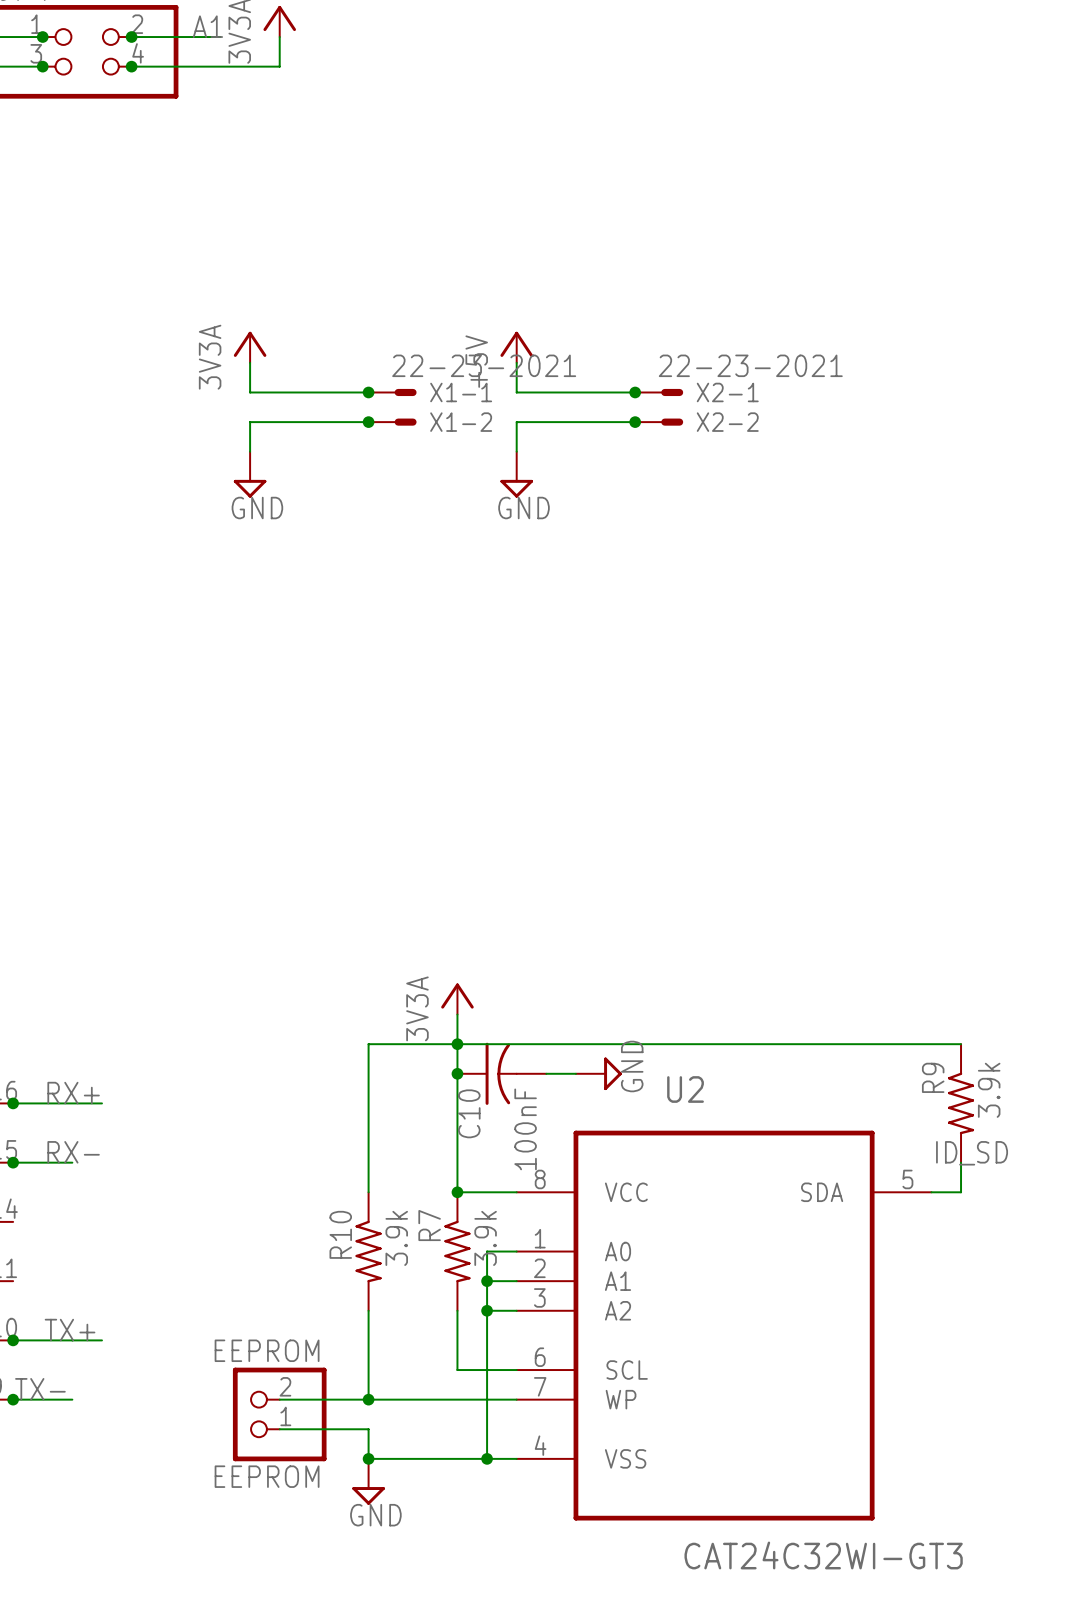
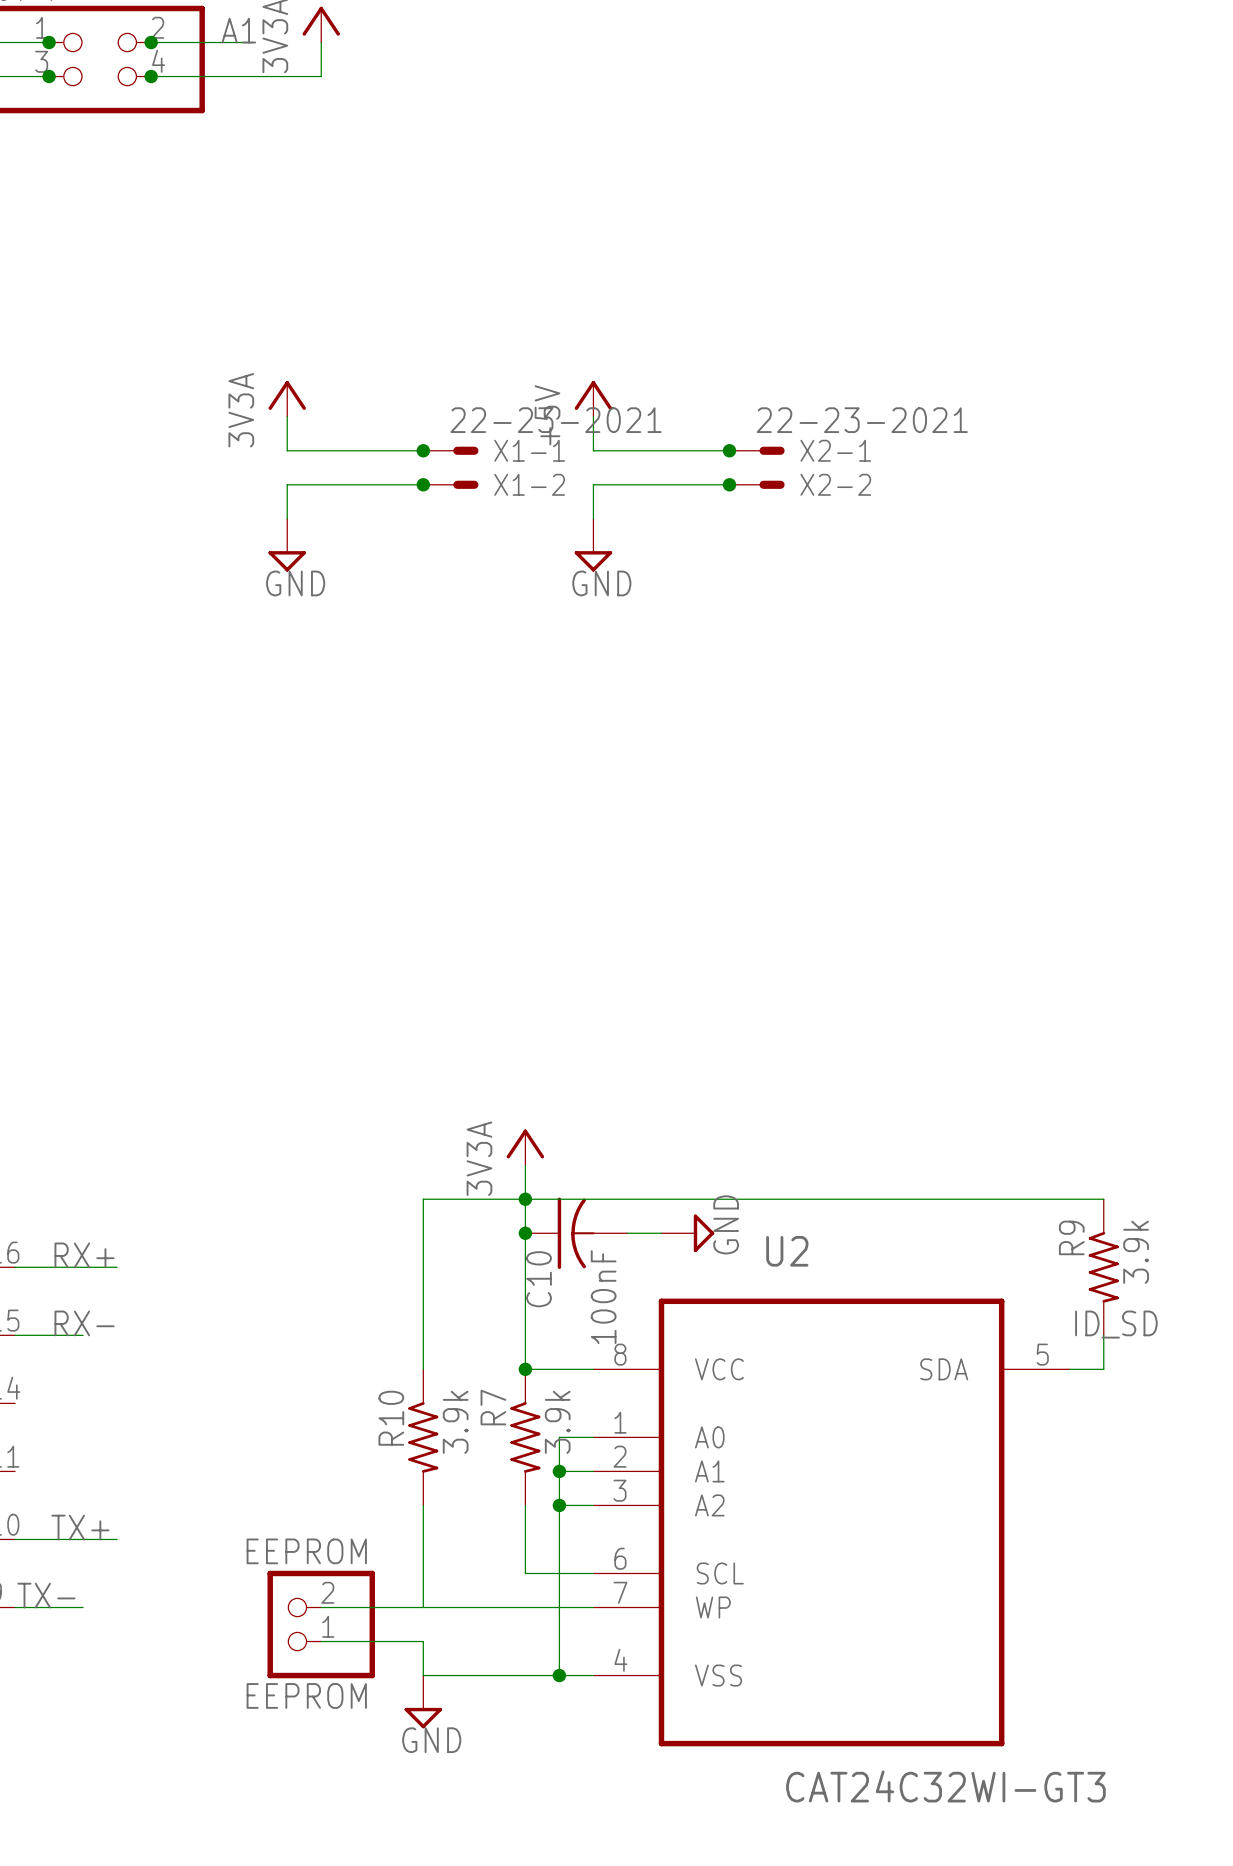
junction: (13, 1103) -> none
junction: (13, 1162) -> none
junction: (13, 1340) -> none
junction: (13, 1399) -> none
junction: (368, 1399) -> none
junction: (368, 1458) -> none

